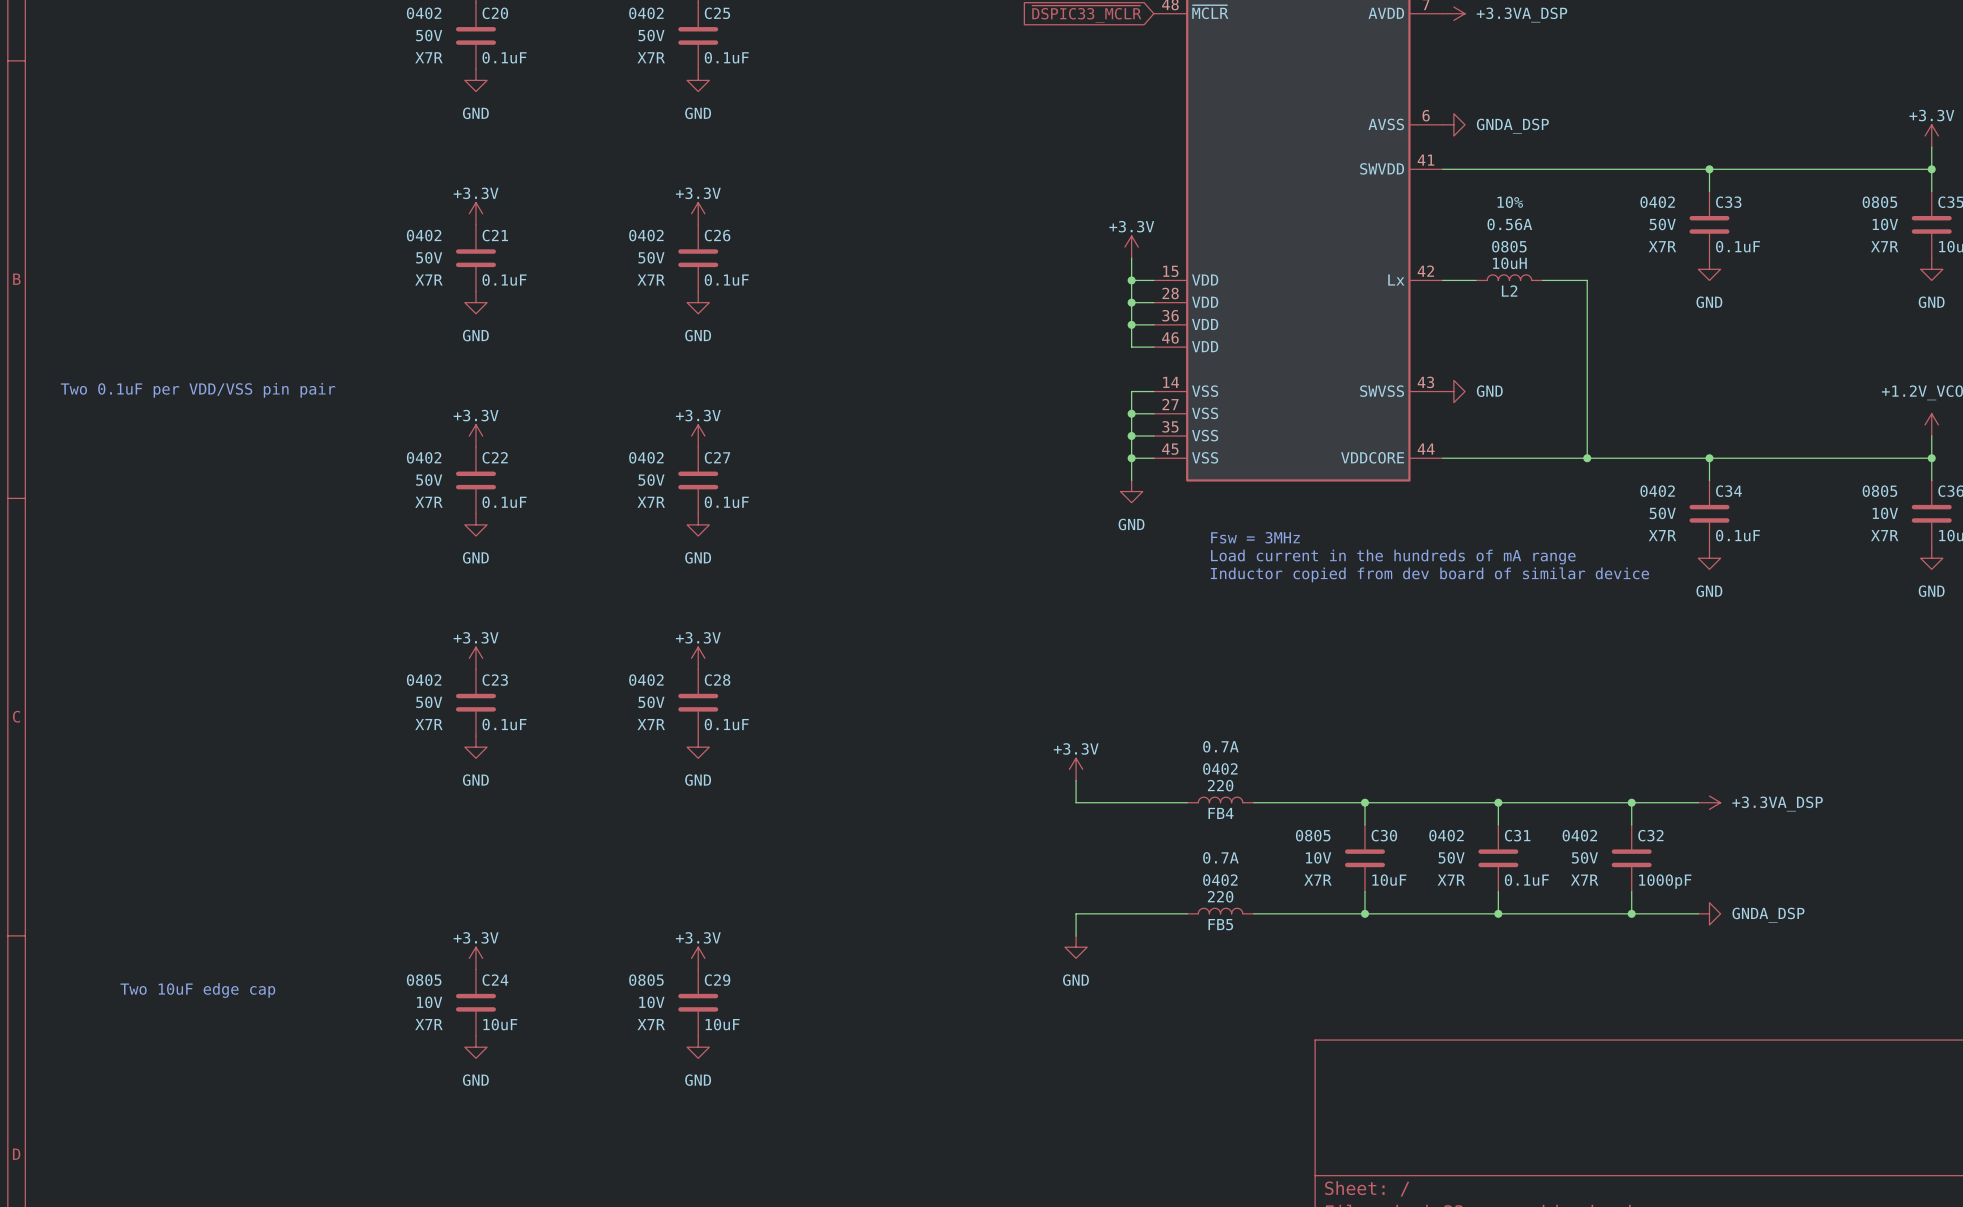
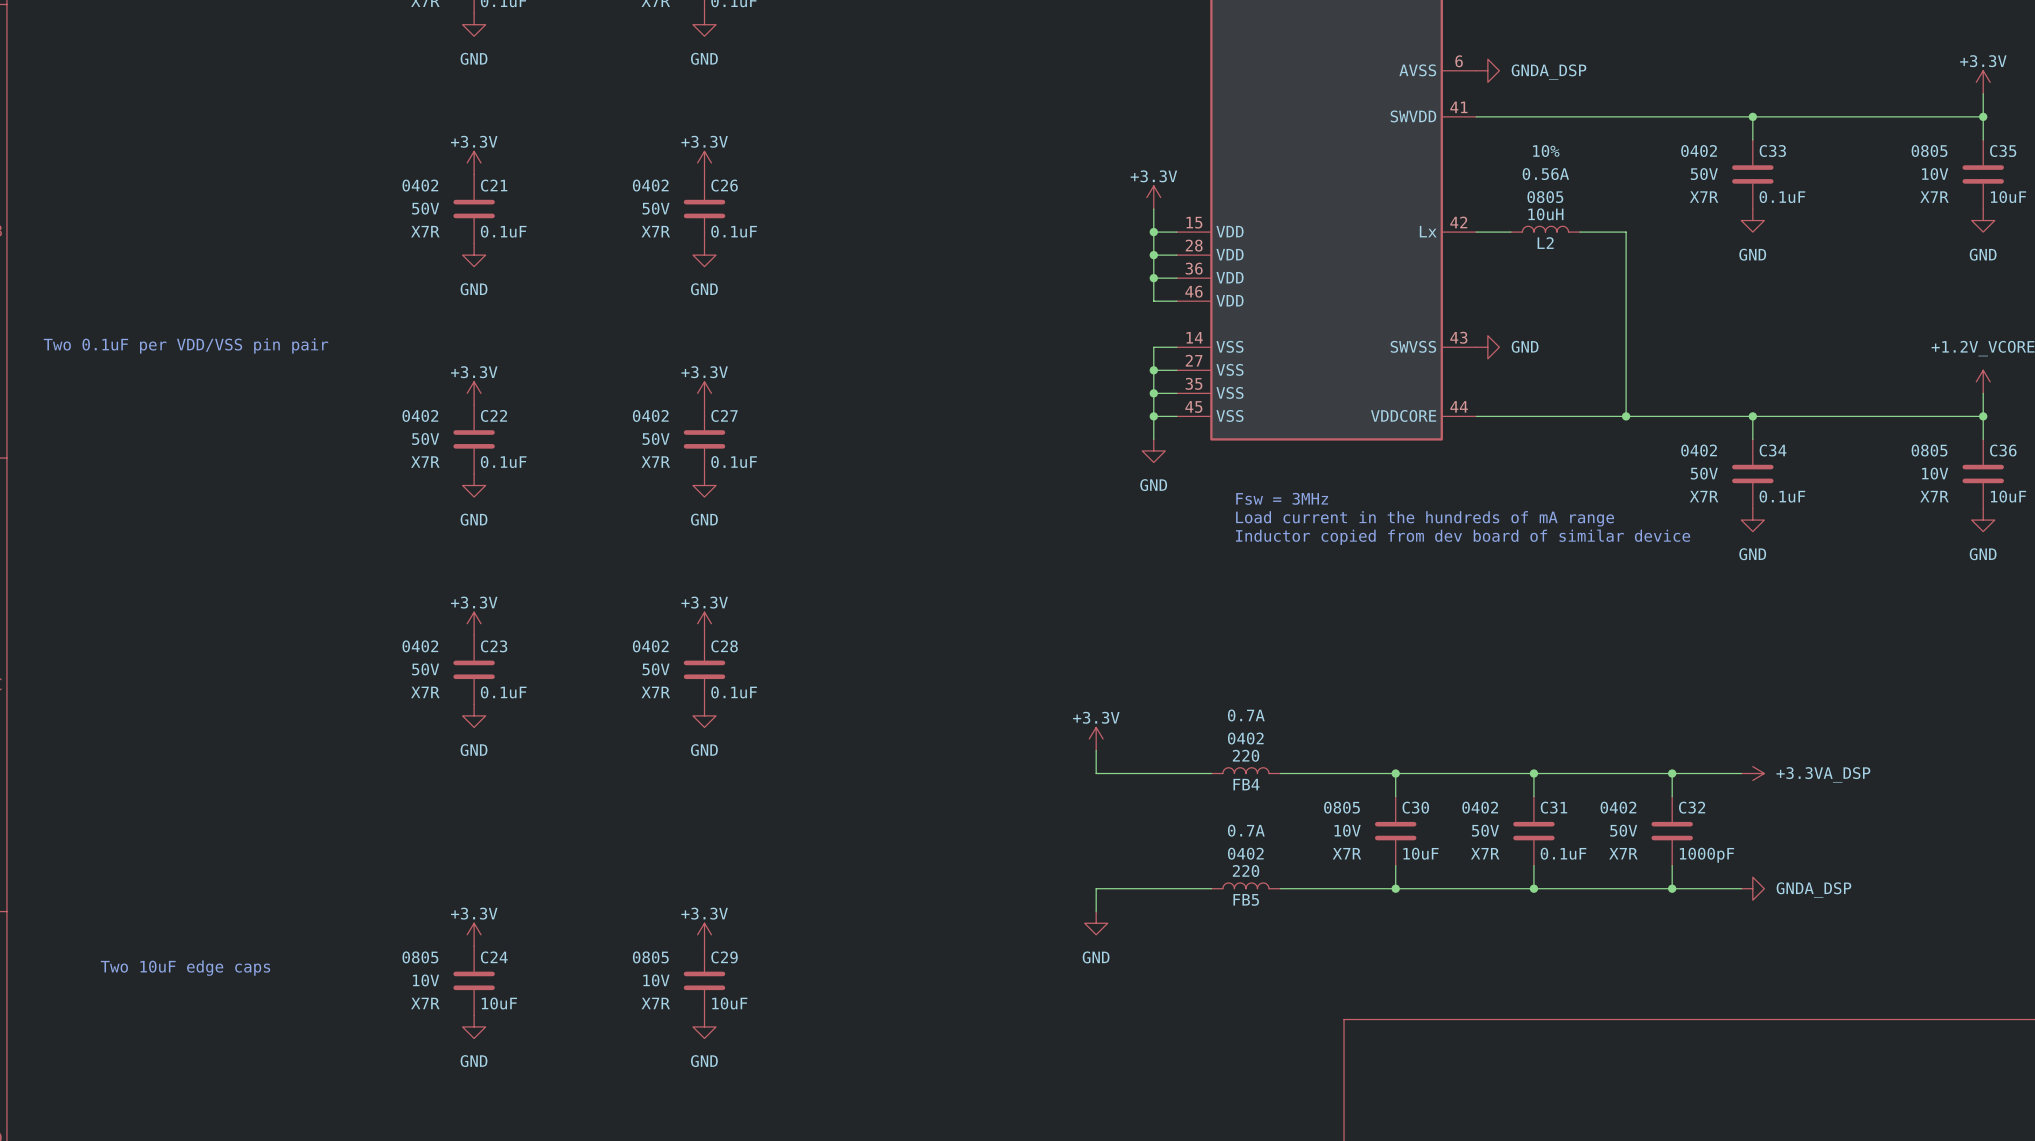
text: Two 10uF edge cap (197, 990) -> Two 10uF edge caps (185, 968)

